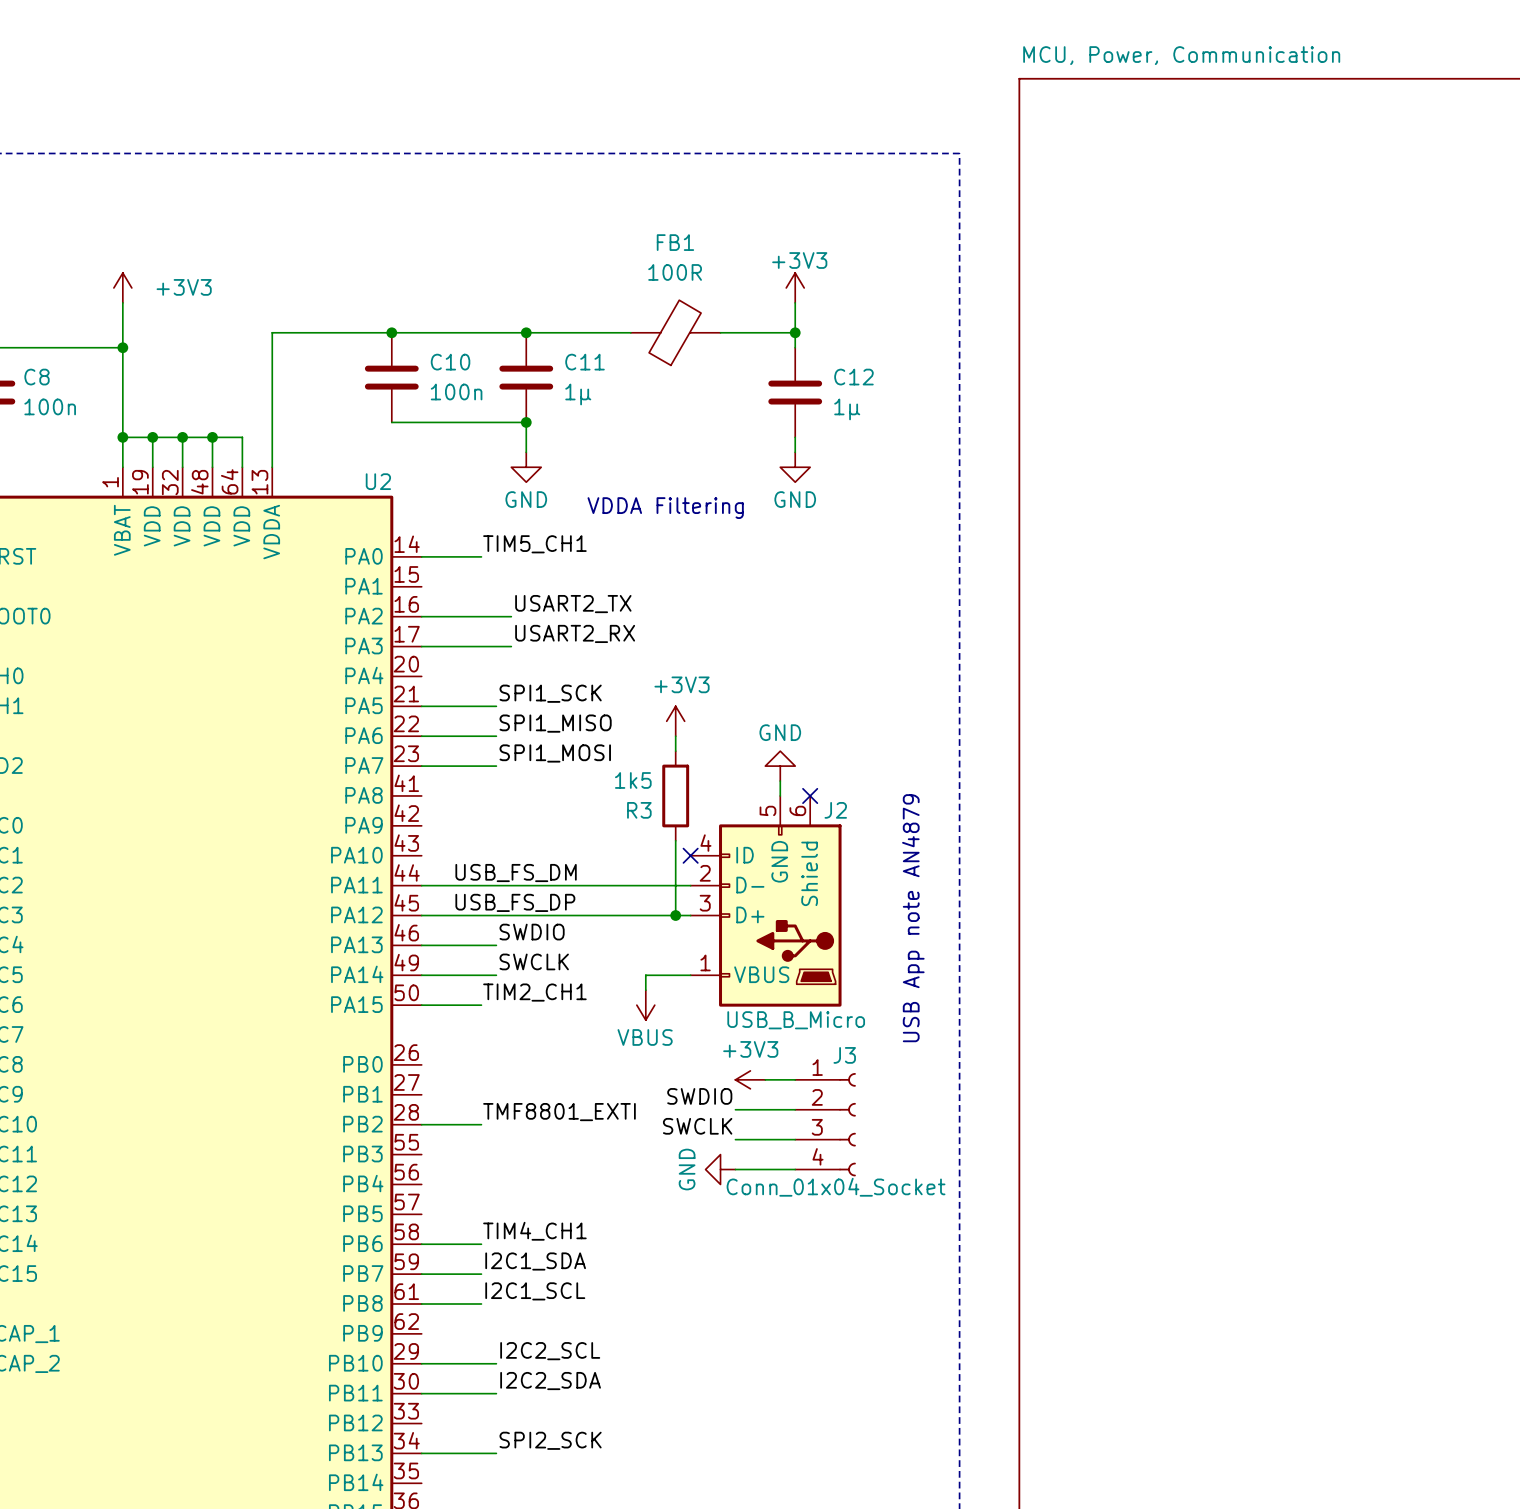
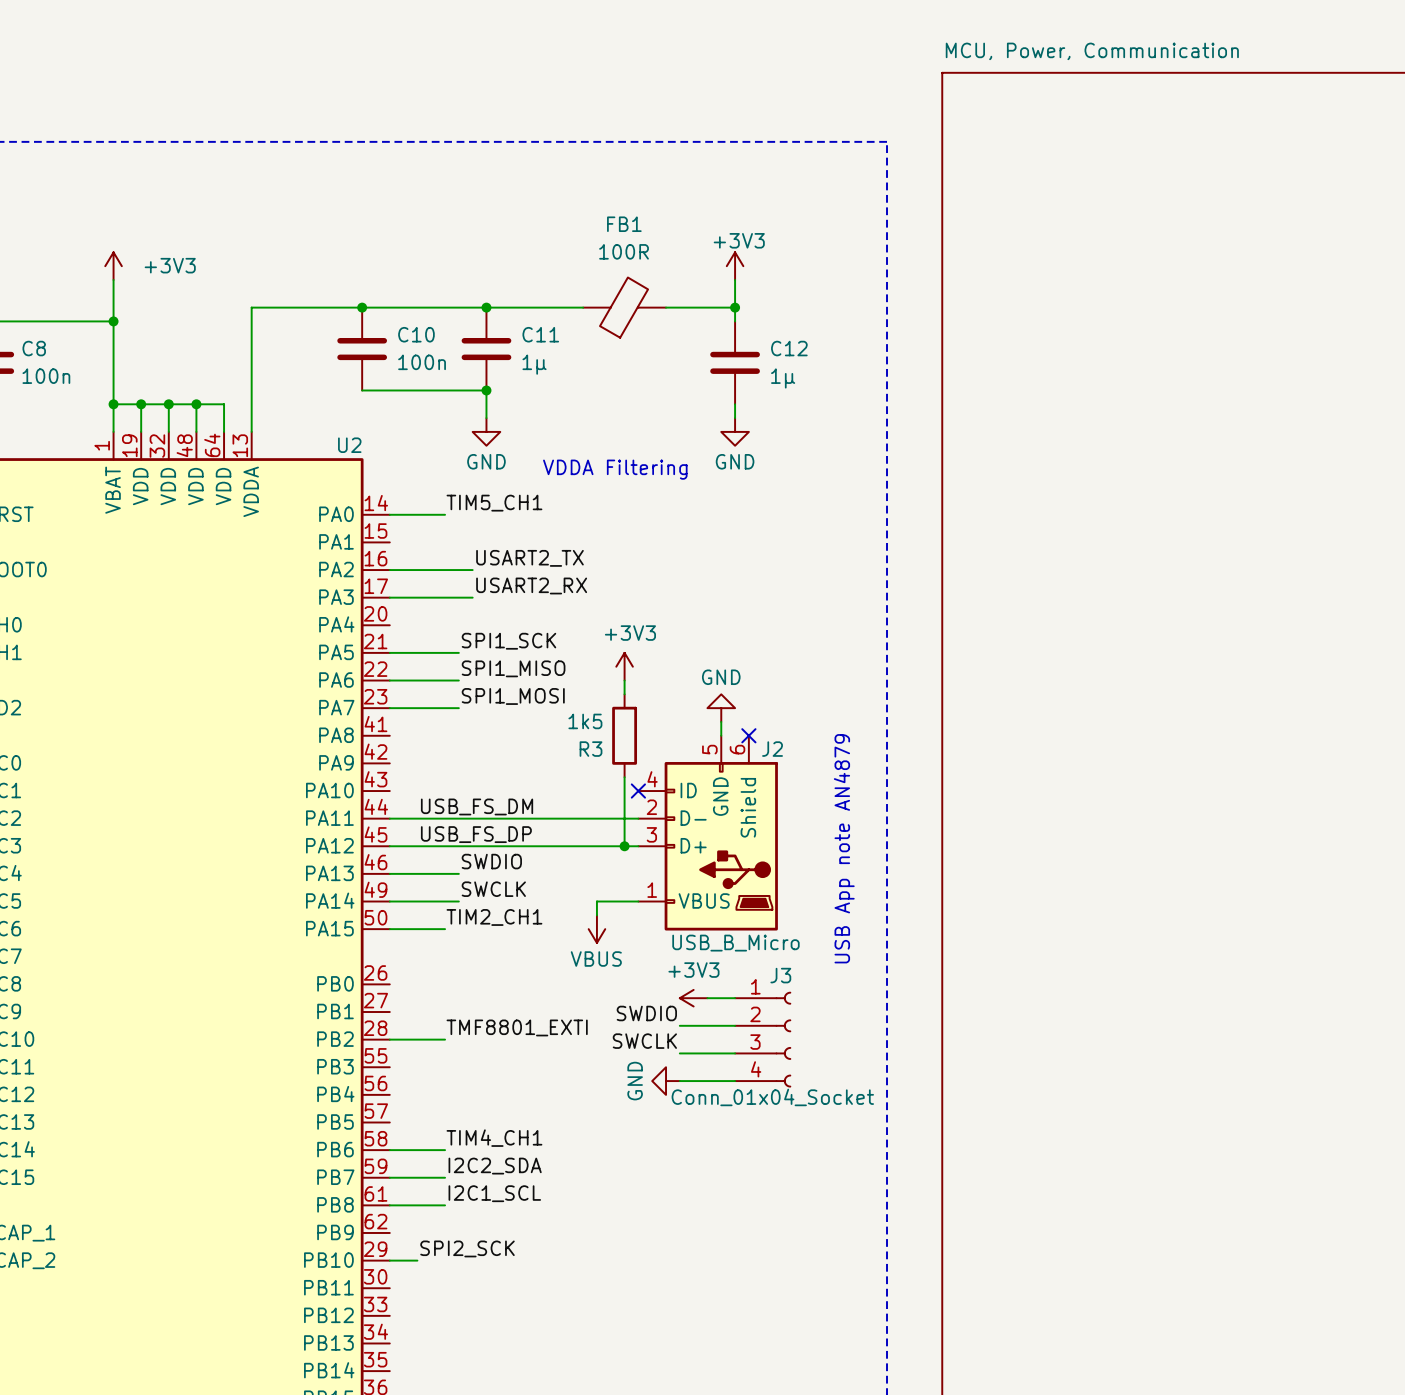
label: I2C1_SDA (535, 1261) -> I2C2_SDA (495, 1166)
label: I2C2_SCL (550, 1351) -> none
wire: (451, 1363) (496, 1363) -> none
label: I2C2_SDA (550, 1381) -> none
wire: (421, 1393) (496, 1393) -> none
label position: SPI2_SCK (550, 1440) -> SPI2_SCK (467, 1248)
wire: (421, 1453) (496, 1453) -> none

